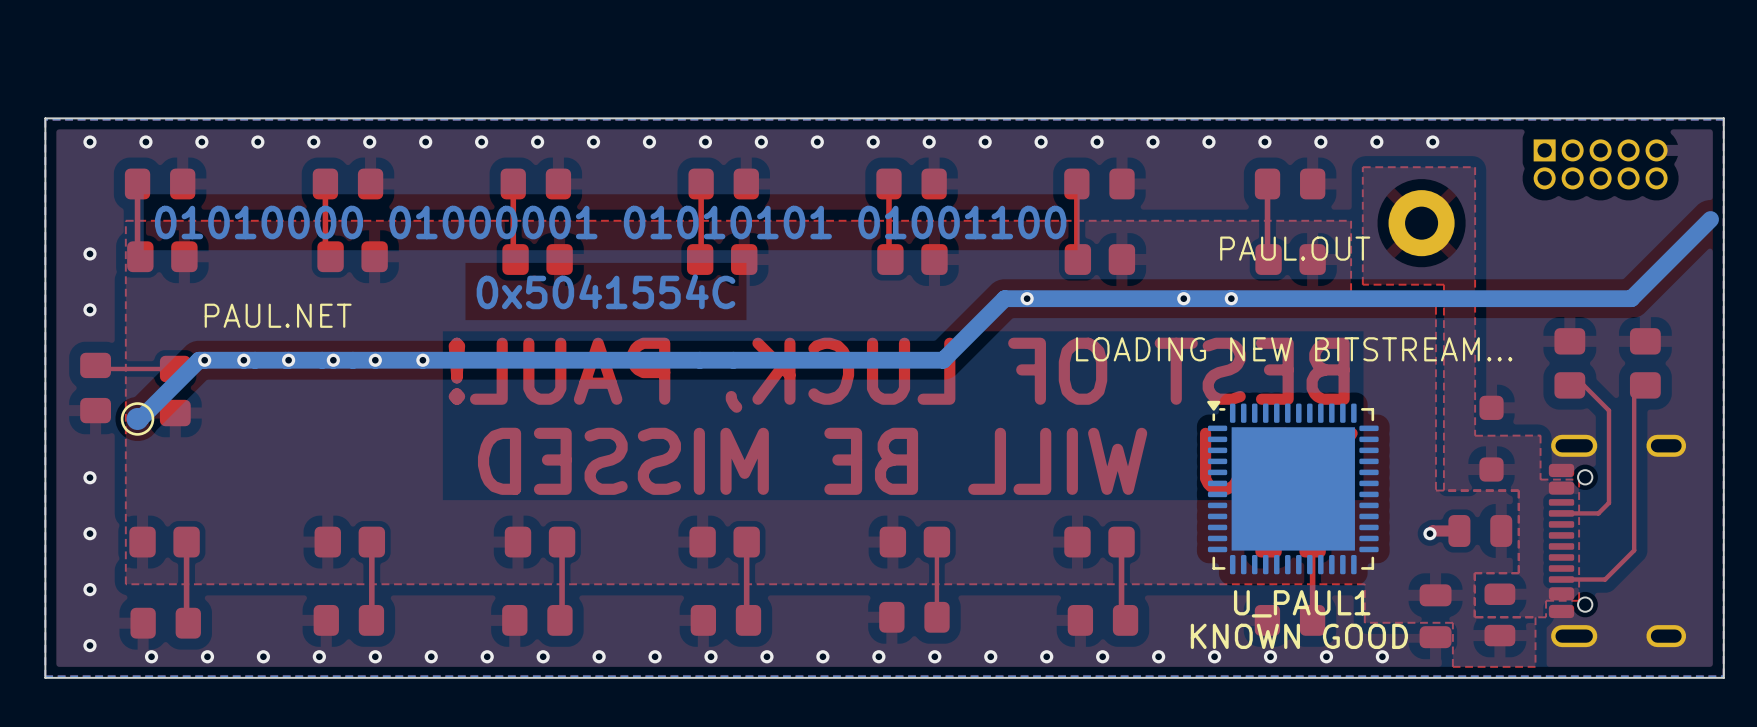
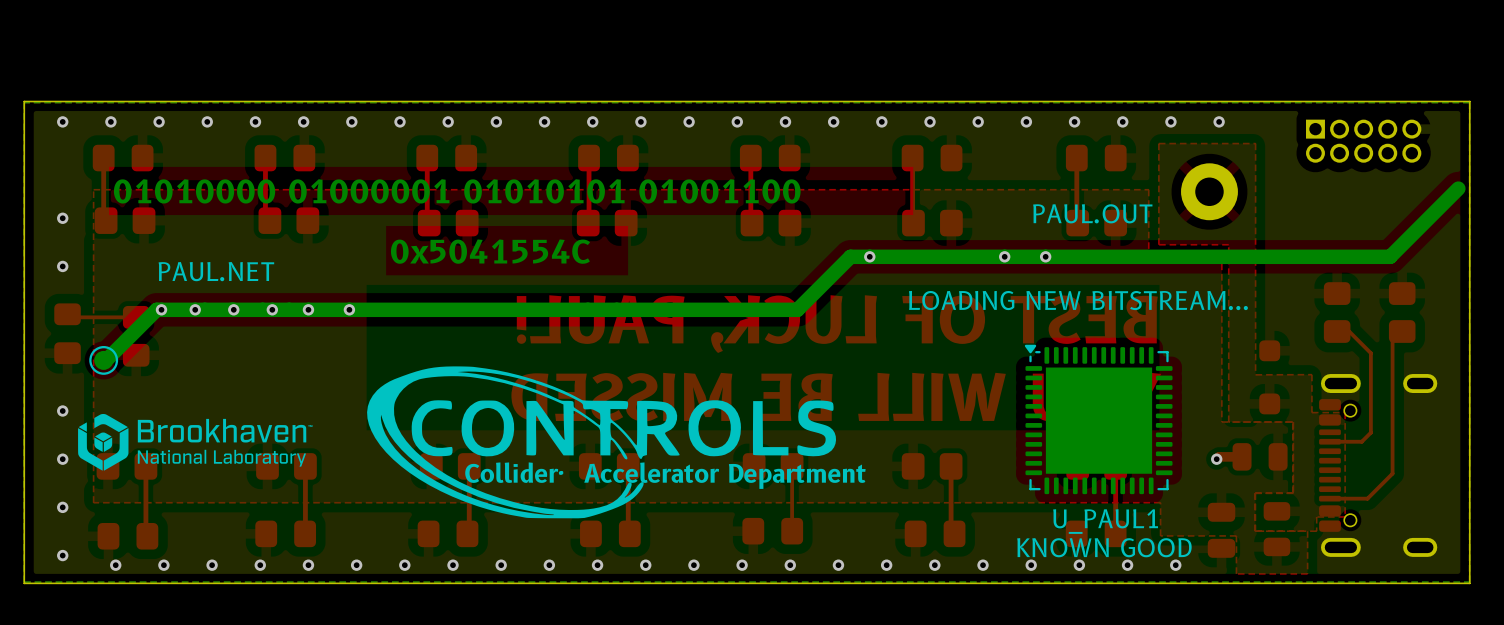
drawing: none -> [367, 366, 837, 519]
drawing: none -> [78, 413, 313, 471]

